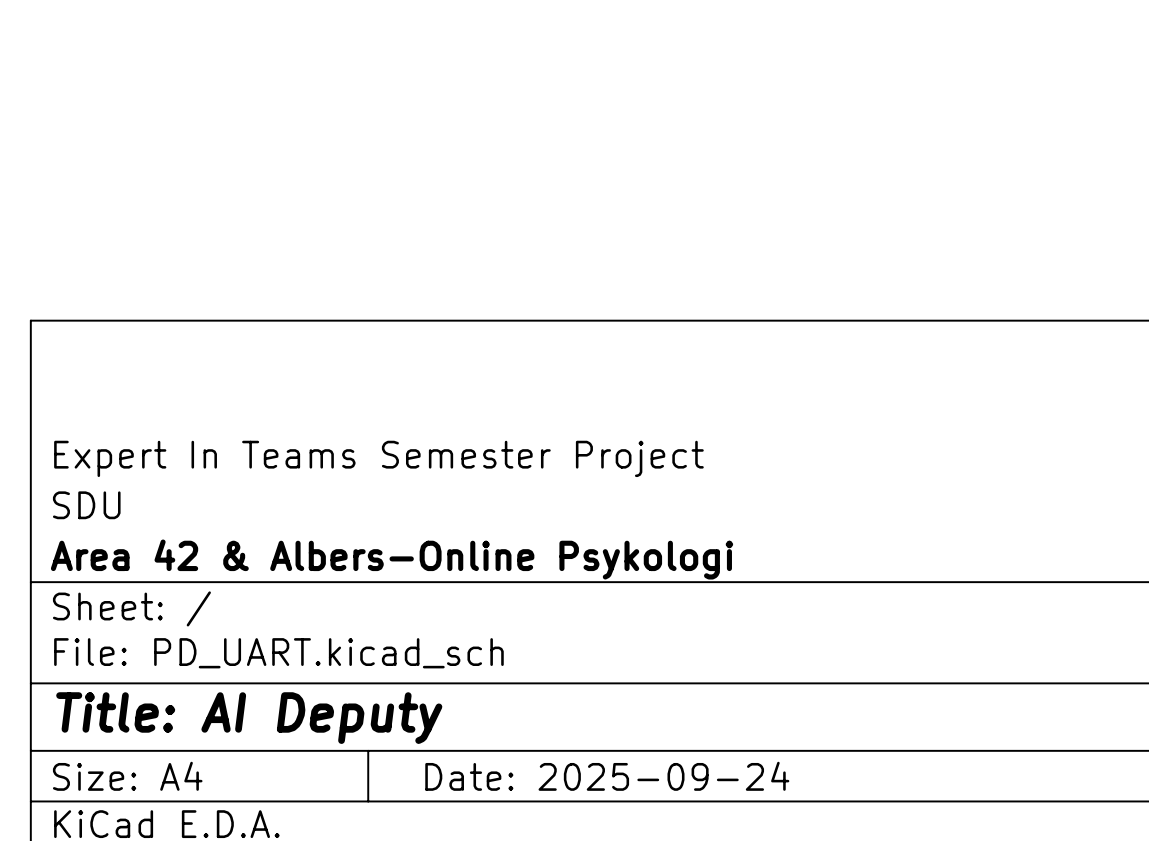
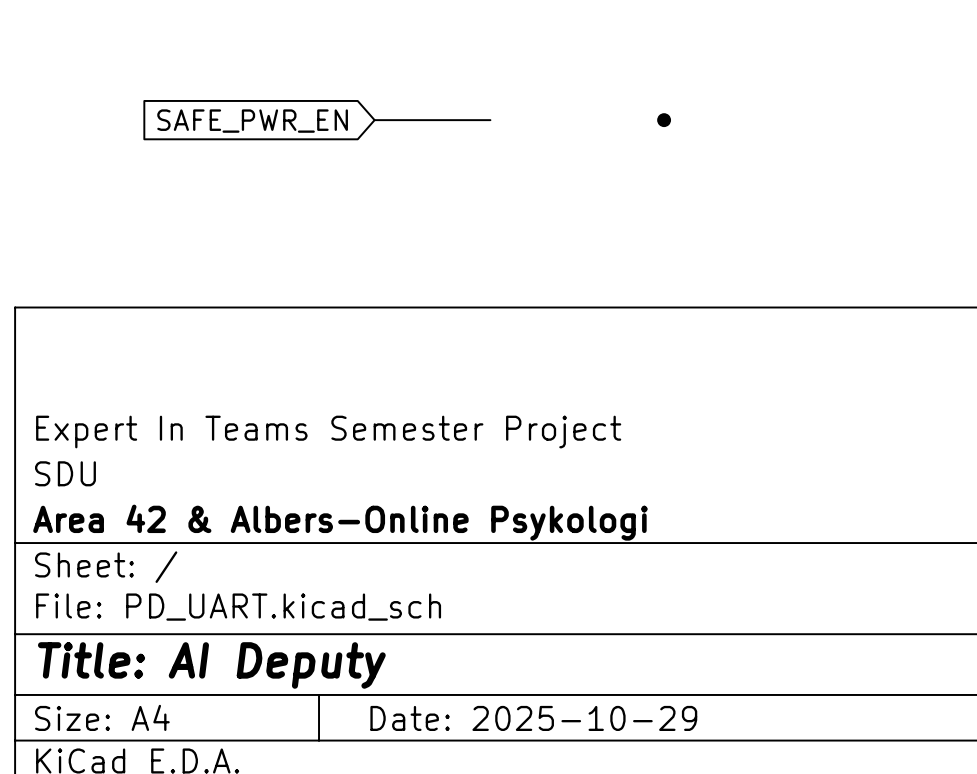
wire: none -> (374, 120) (490, 120)
junction: none -> (664, 120)
global label: none -> SAFE_PWR_EN (252, 121)
title block: Date: 2025-09-24 (607, 776) -> Date: 2025-10-29 (533, 718)

